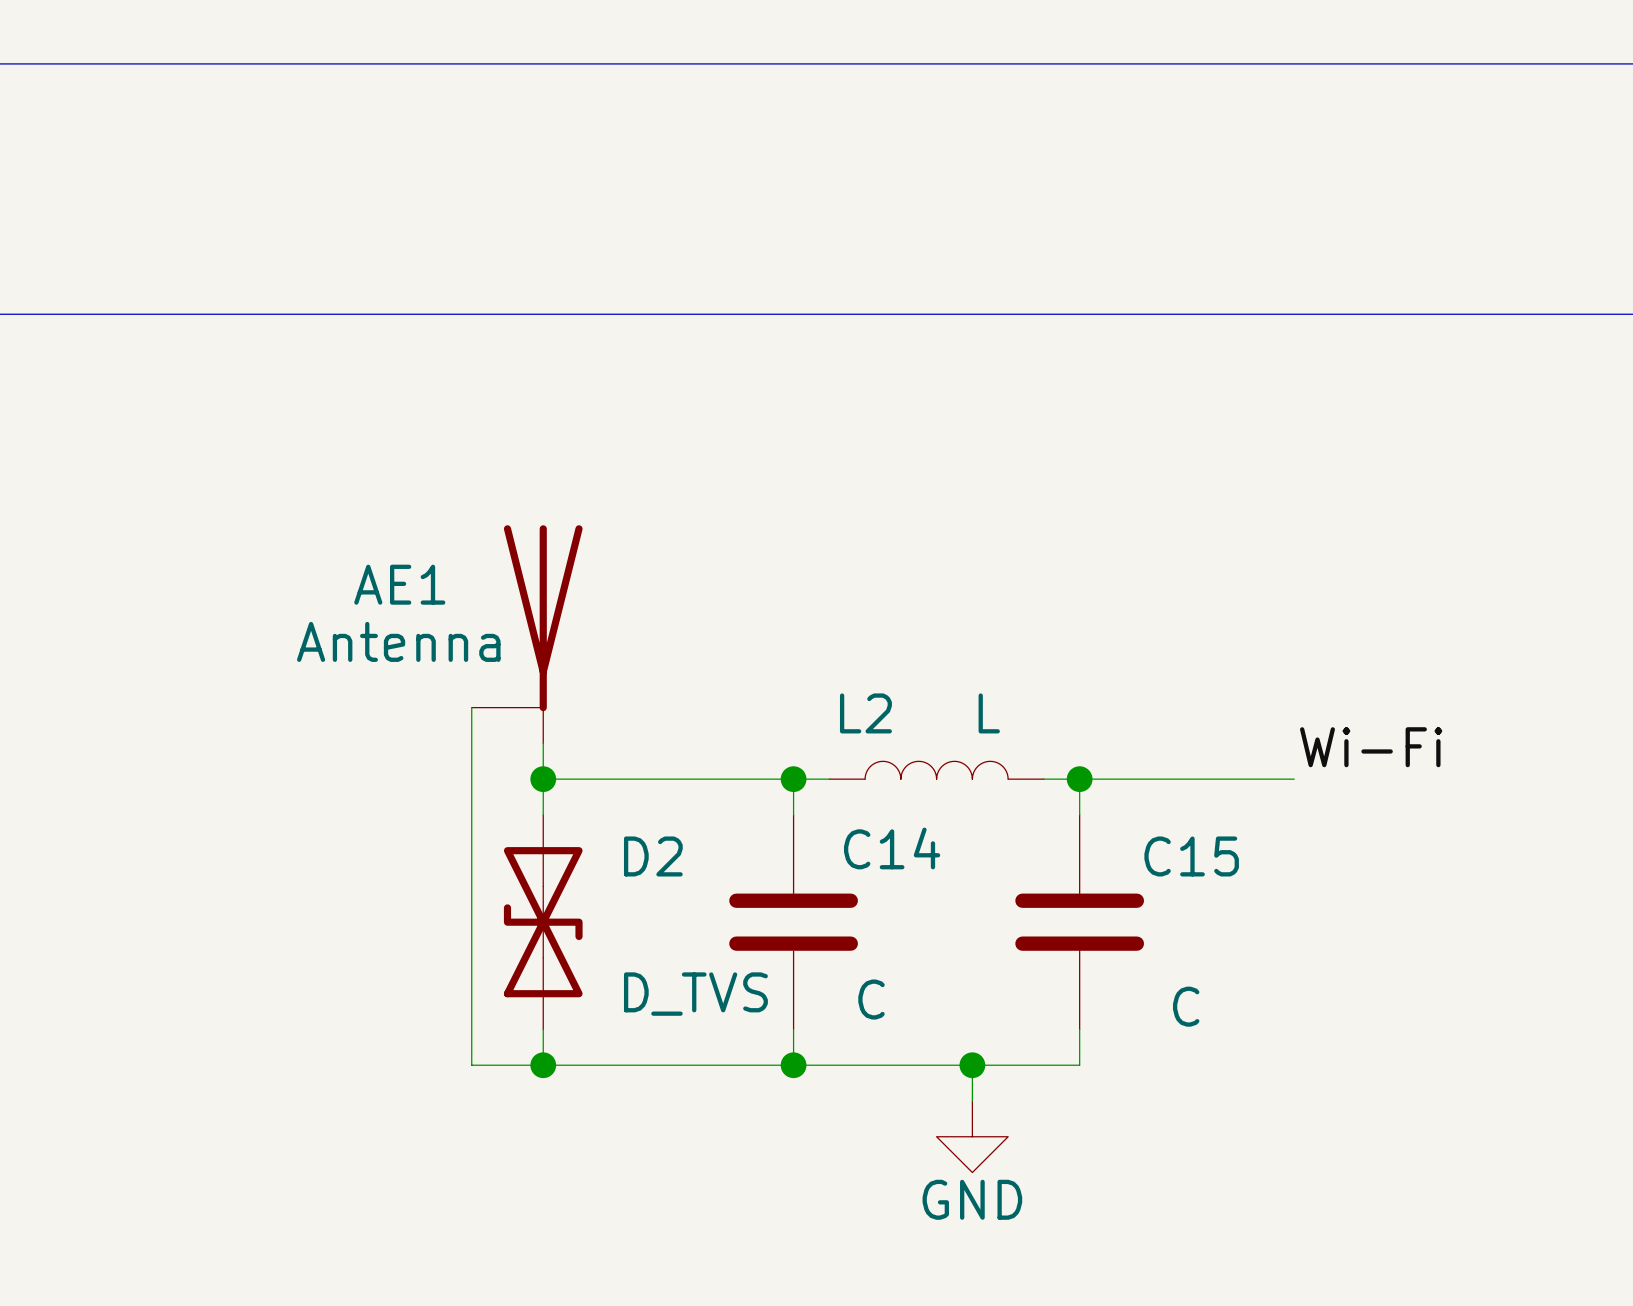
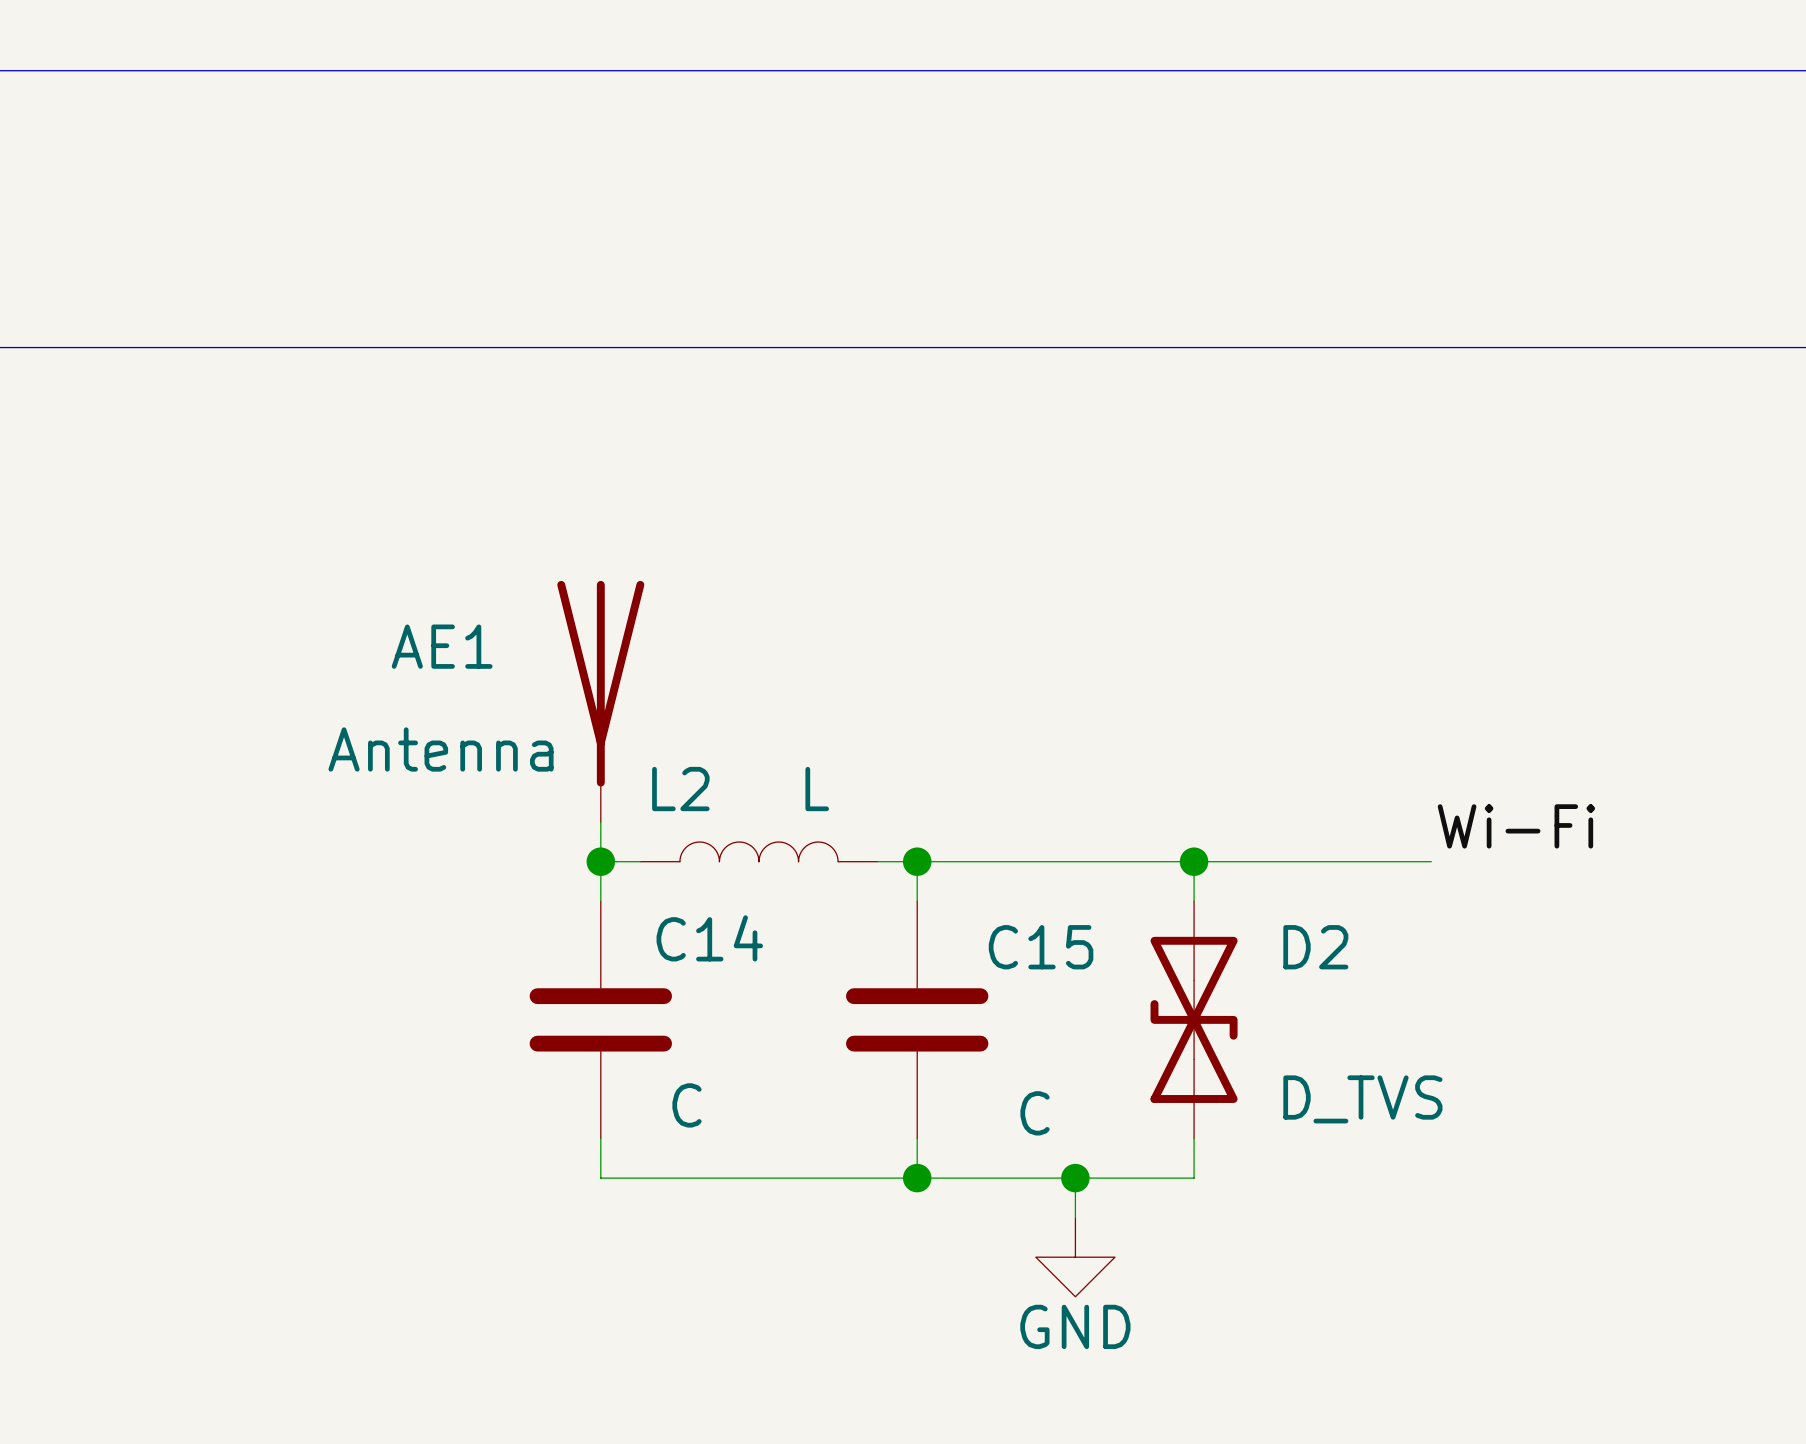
AE1 symbol: [471, 525, 583, 744] -> [557, 580, 645, 823]
wire: (471, 707) (471, 1065) (543, 1065) -> none
L2 position: (936, 770) -> (759, 851)
wire: (579, 779) (793, 779) (793, 814) -> none
junction position: (793, 779) -> (917, 861)
wire: none -> (1154, 861) (917, 861) (917, 901)
D2 position: (543, 922) -> (1194, 1019)
C14 position: (793, 922) -> (600, 1019)
C15 position: (1079, 922) -> (917, 1019)
wire: (793, 1029) (793, 1065) -> (917, 1138) (917, 1178)
junction: (543, 1065) -> none
junction position: (793, 1065) -> (917, 1178)

